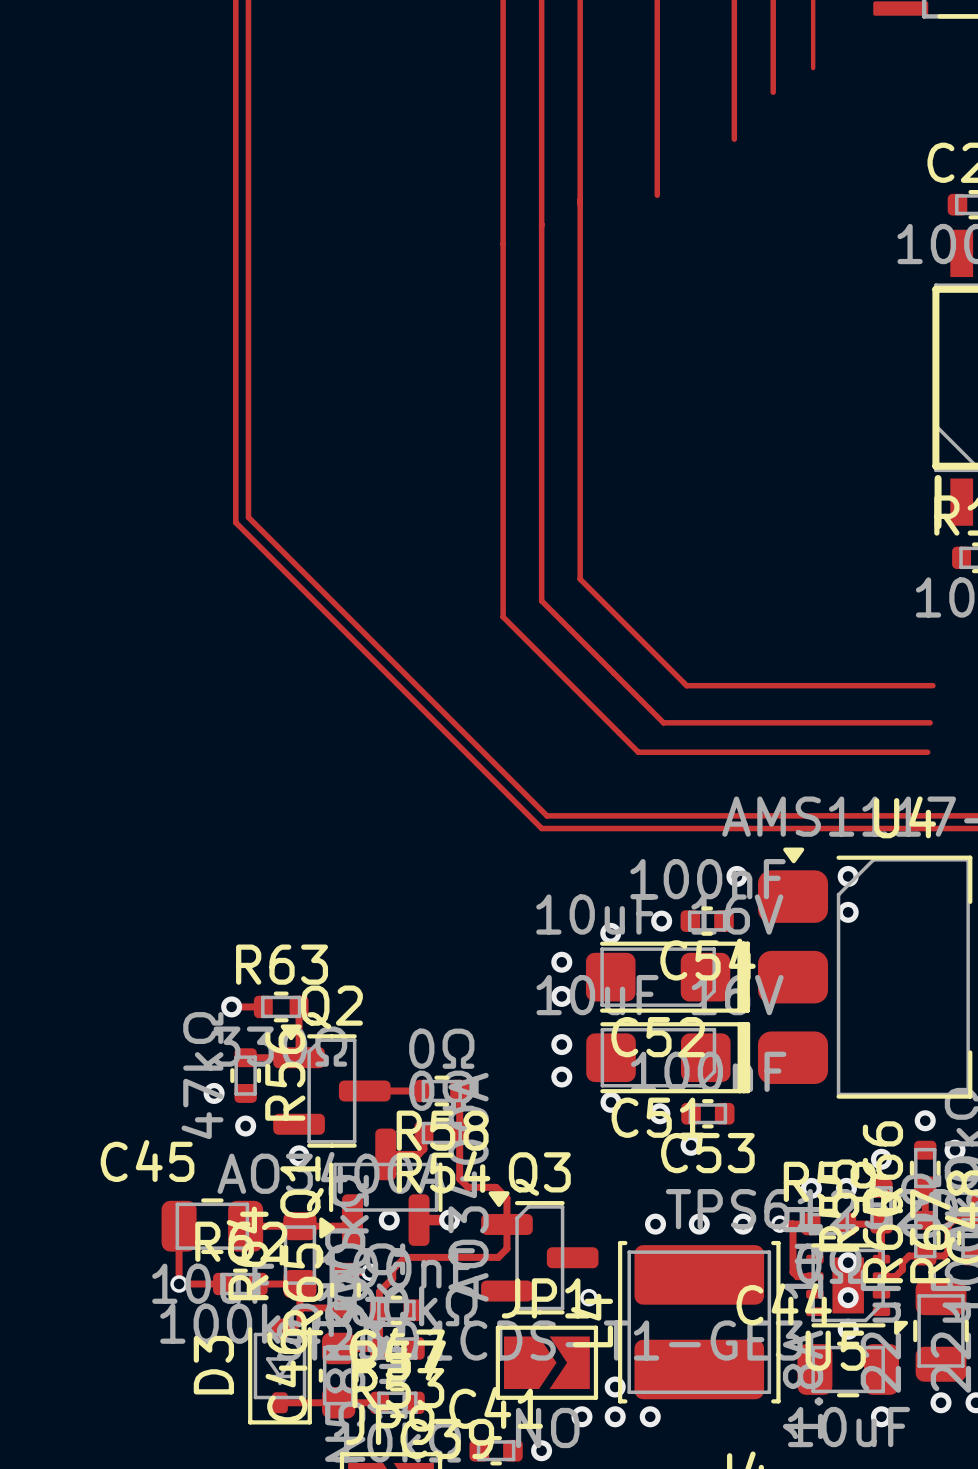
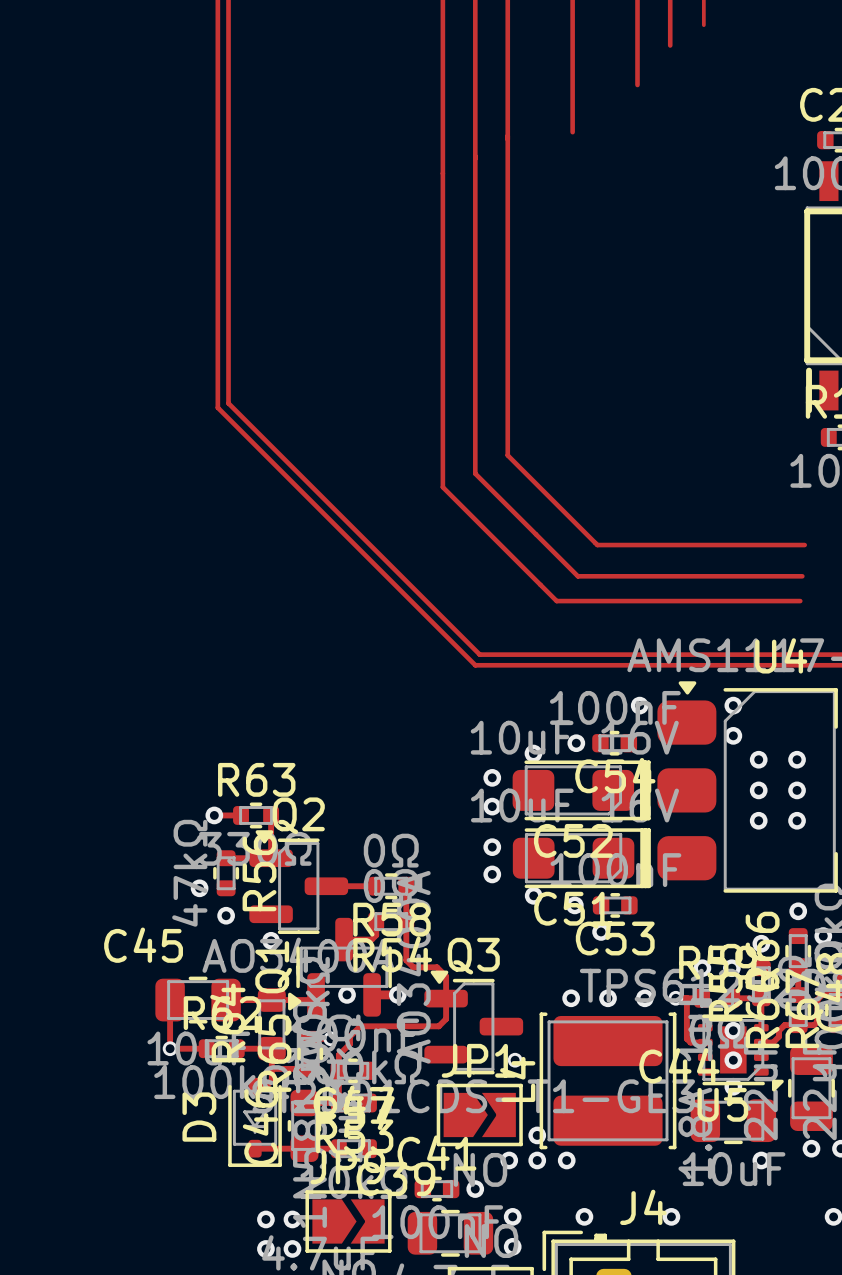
via: none -> (758, 759)
via: none -> (797, 759)
via: none -> (758, 790)
via: none -> (797, 790)
via: none -> (758, 820)
via: none -> (797, 820)

